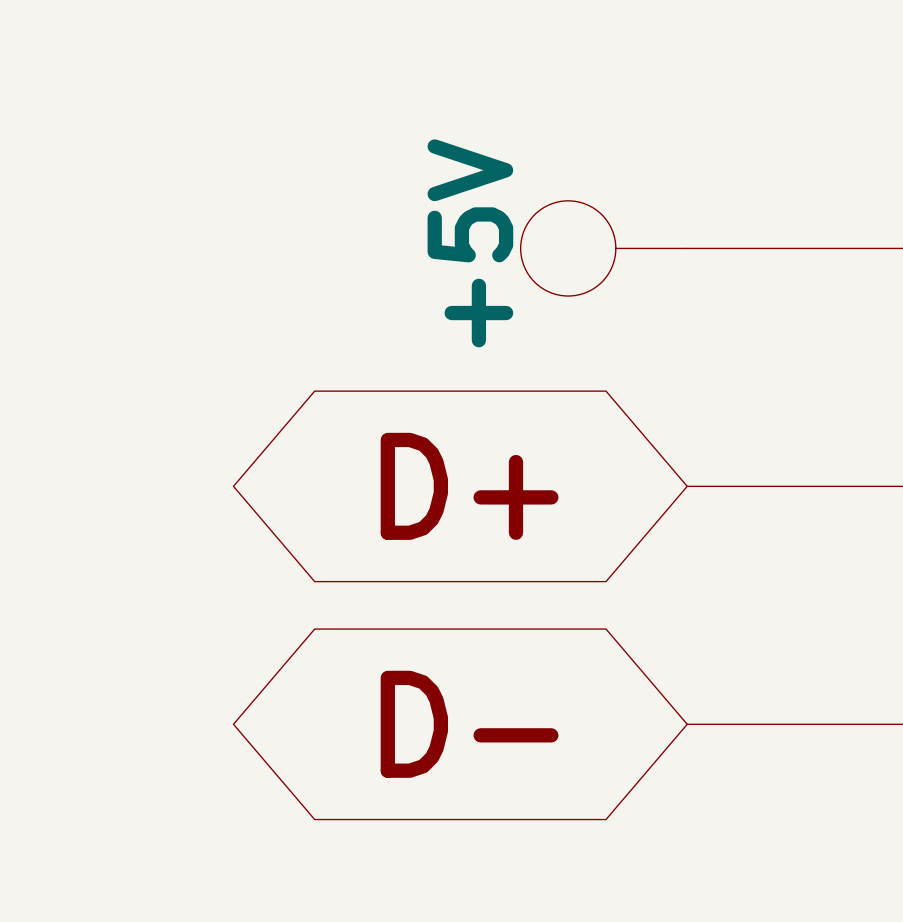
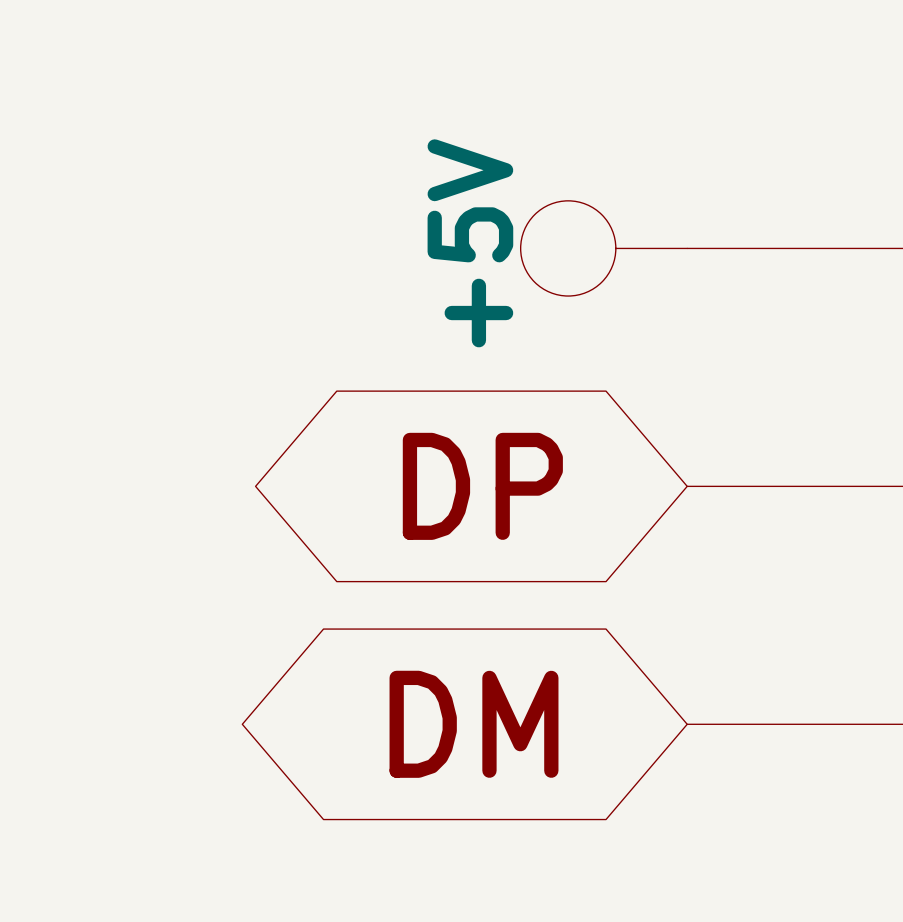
global label: D+ (469, 486) -> DP (482, 486)
global label: D- (469, 724) -> DM (474, 724)

